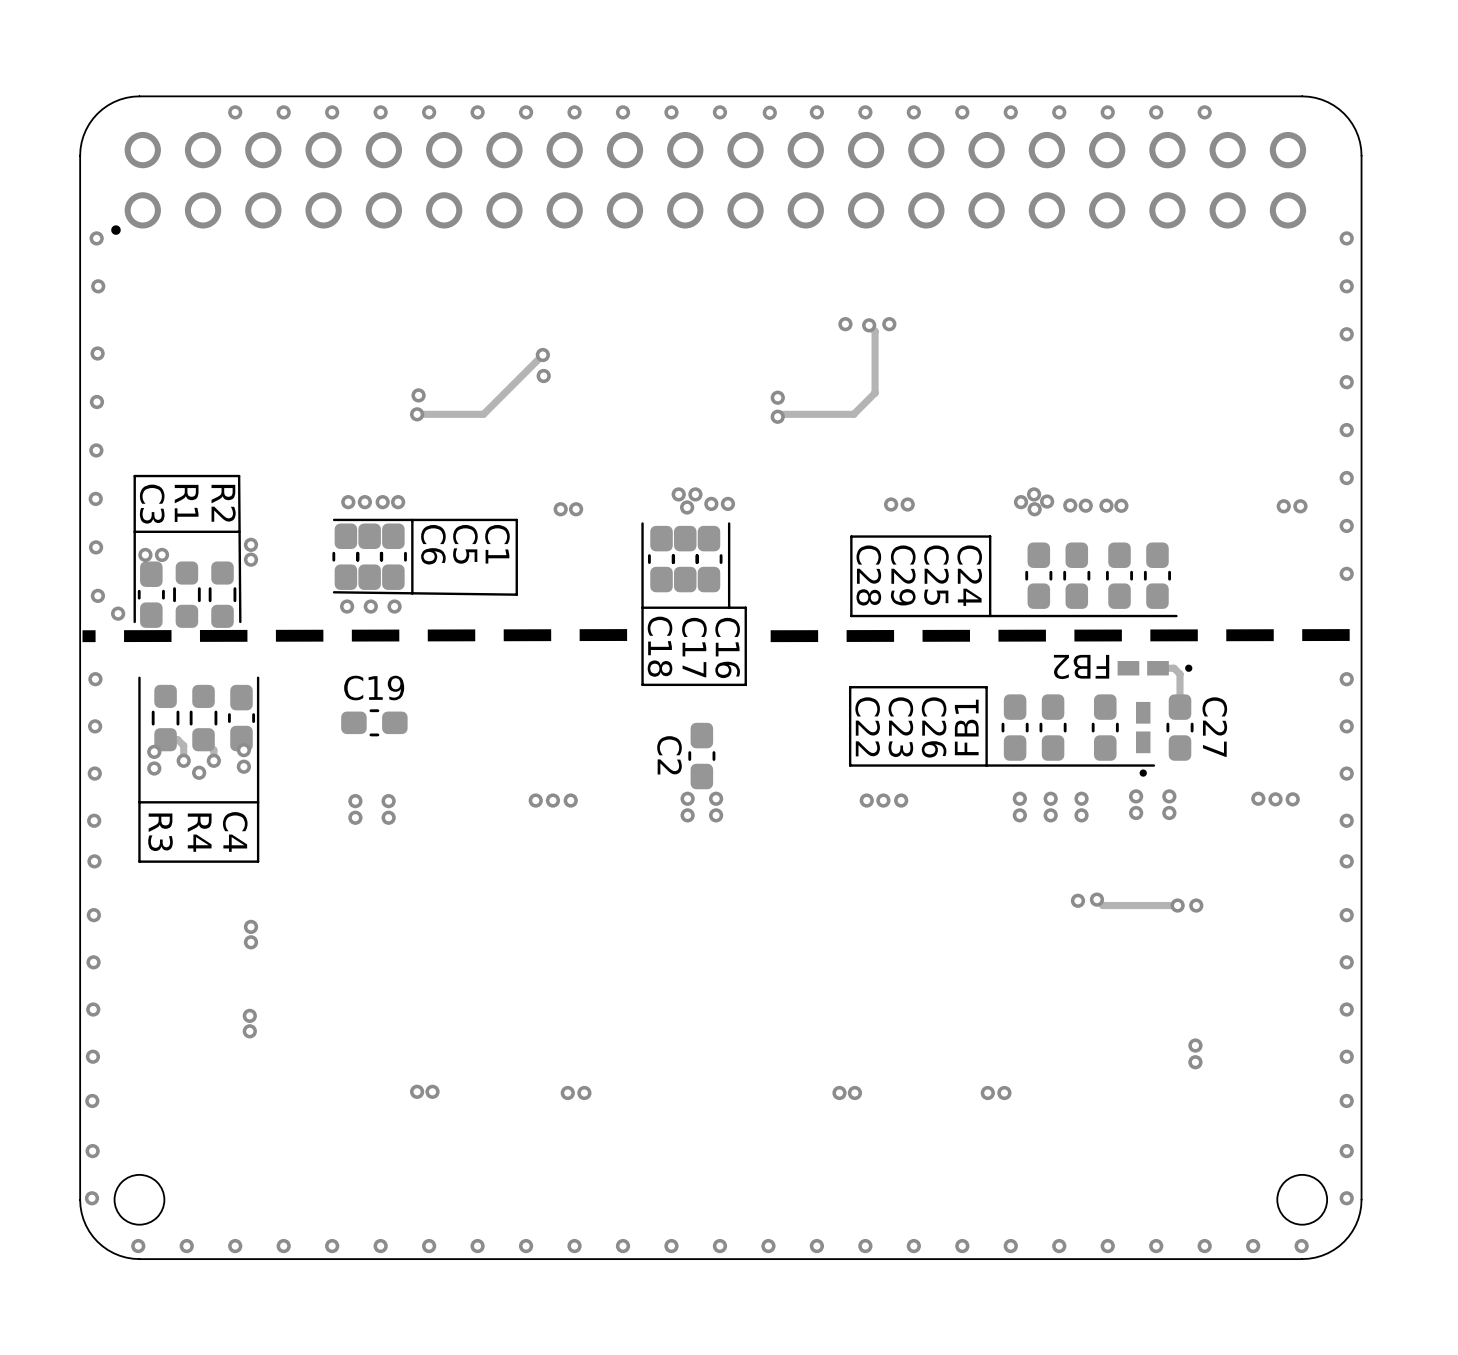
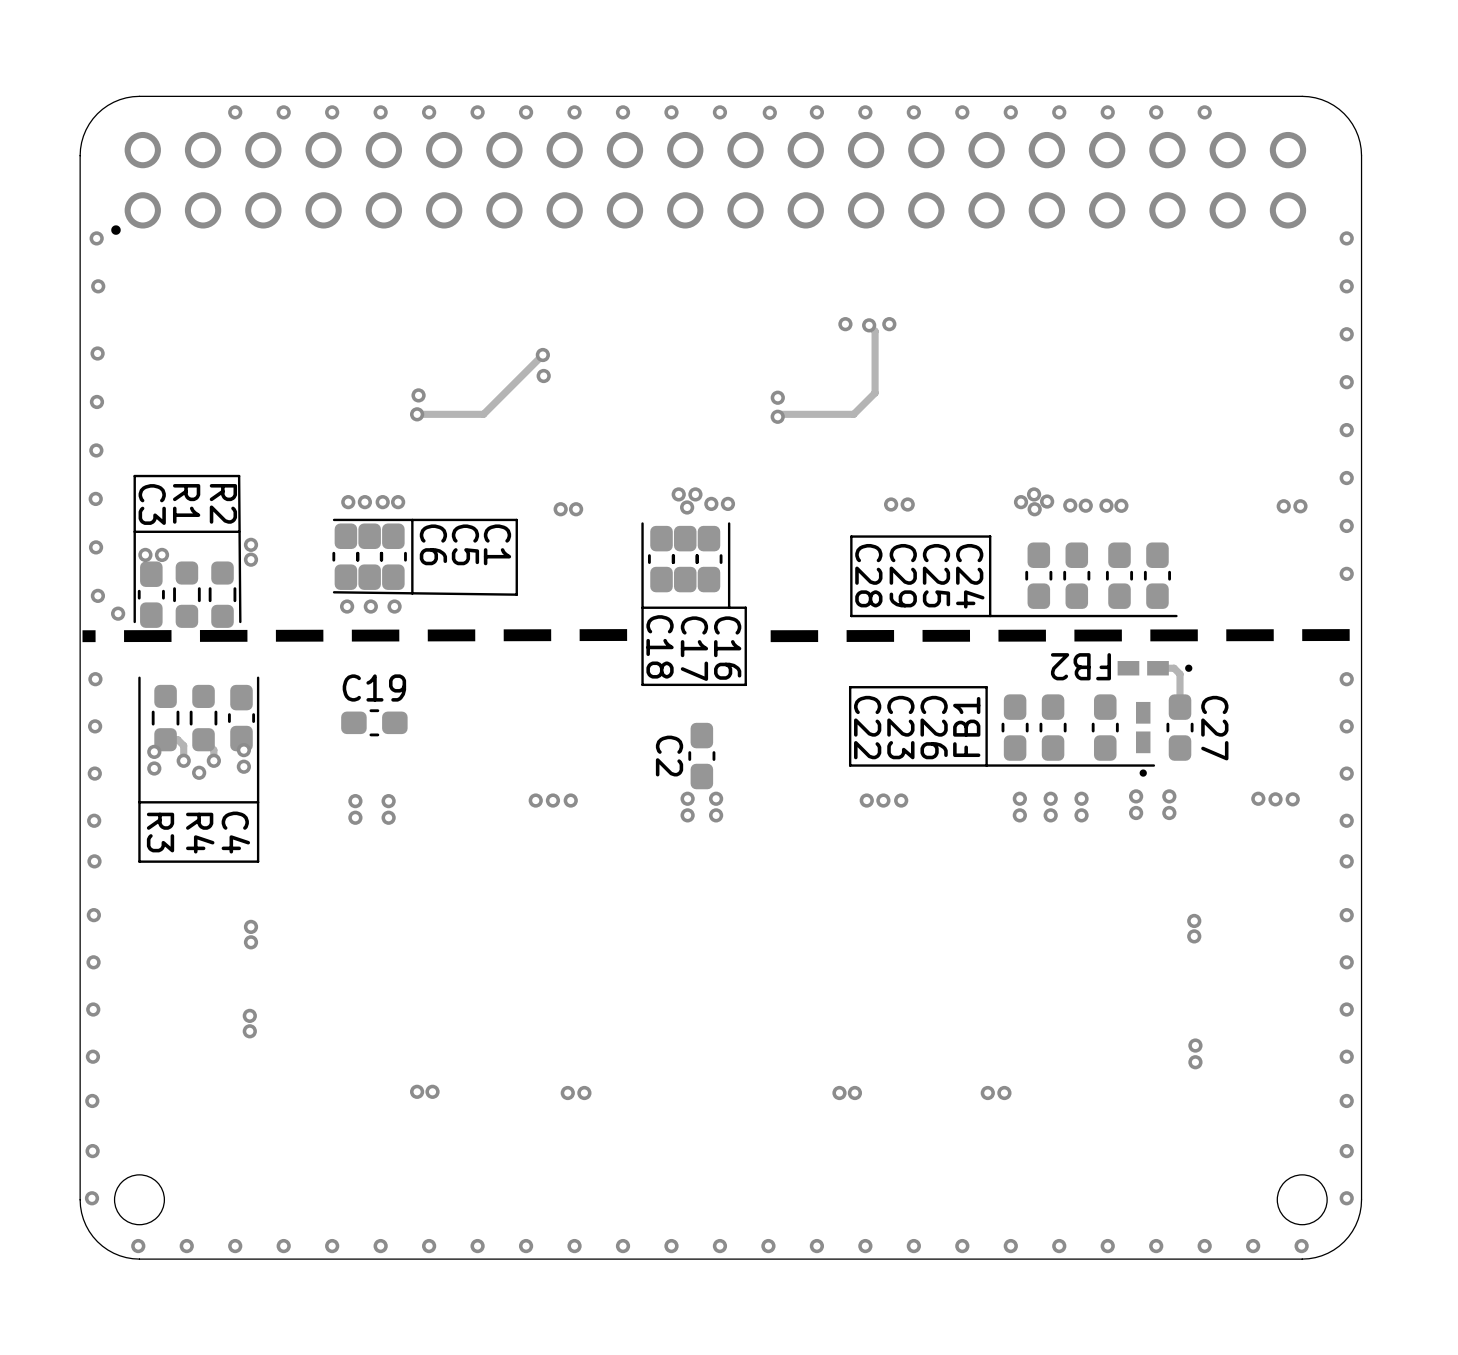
track: (1096, 899) (1102, 905) (1177, 905) -> none
via: (1096, 899) -> none
via: (1077, 900) -> none
via: (1177, 905) -> none
via: (1196, 905) -> none
via: none -> (1194, 920)
via: none -> (1194, 936)

